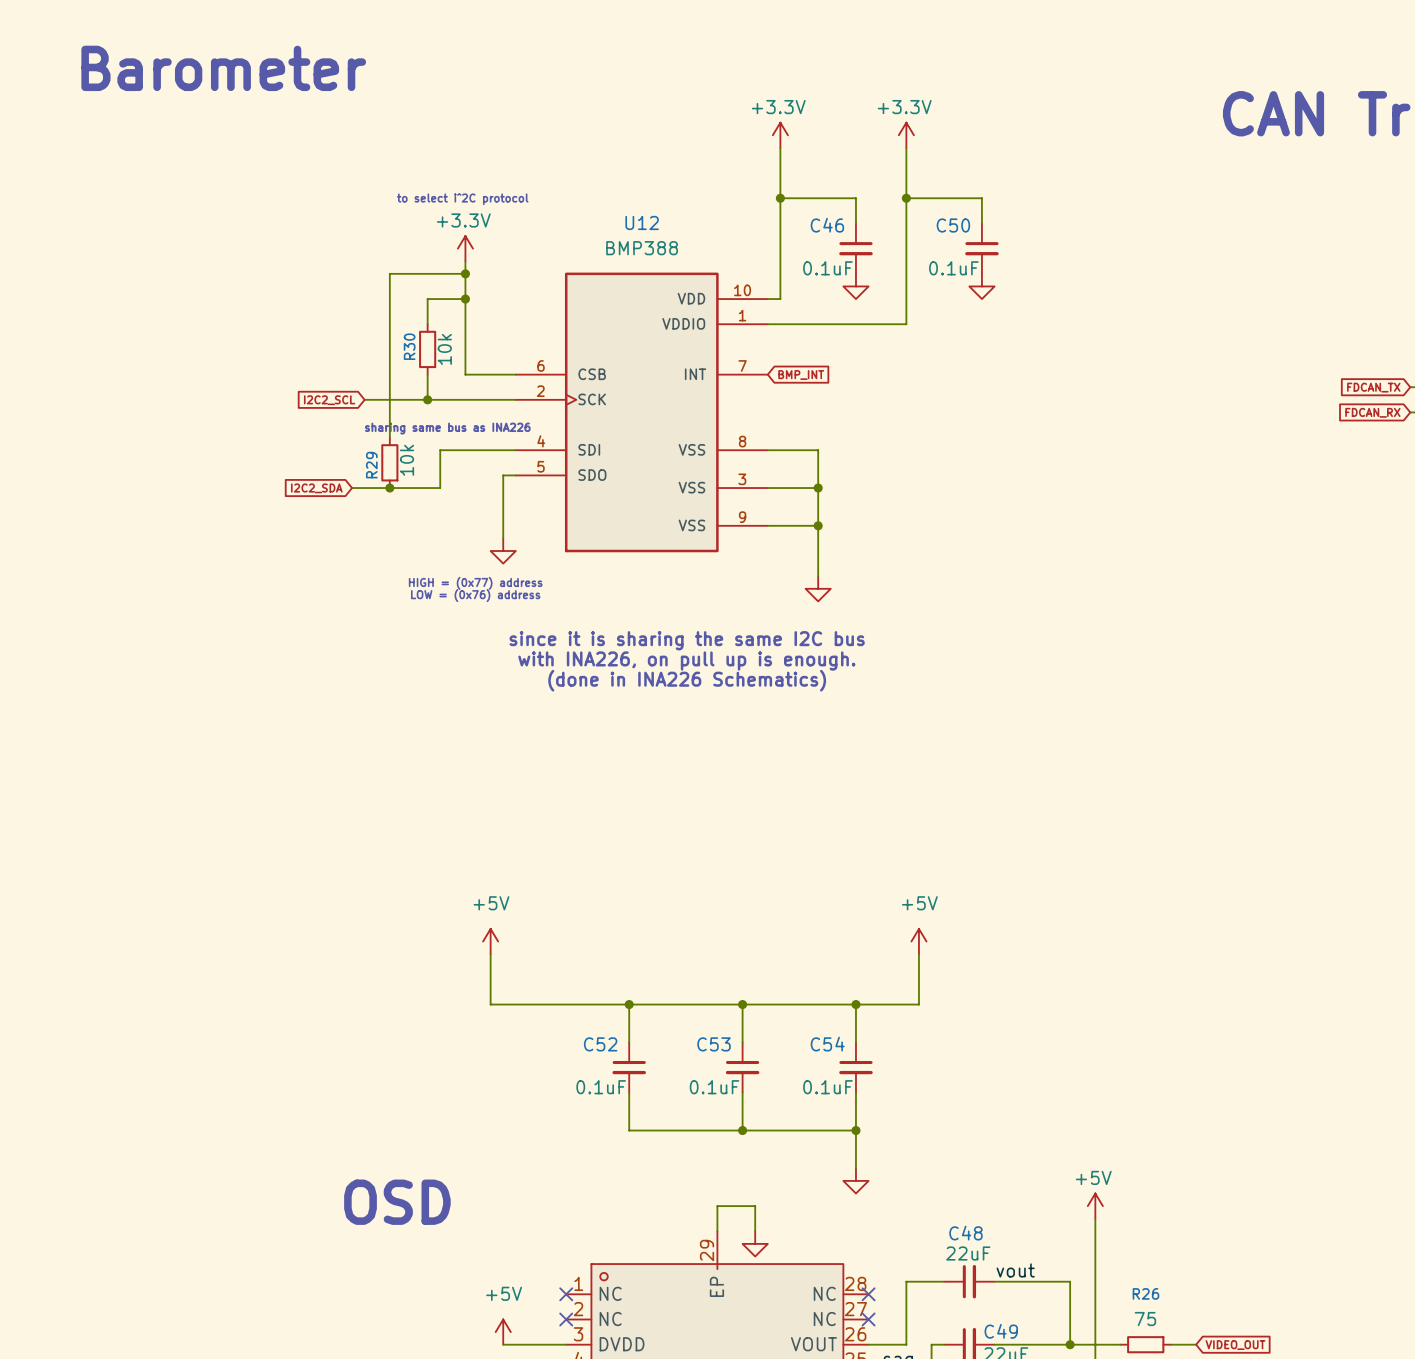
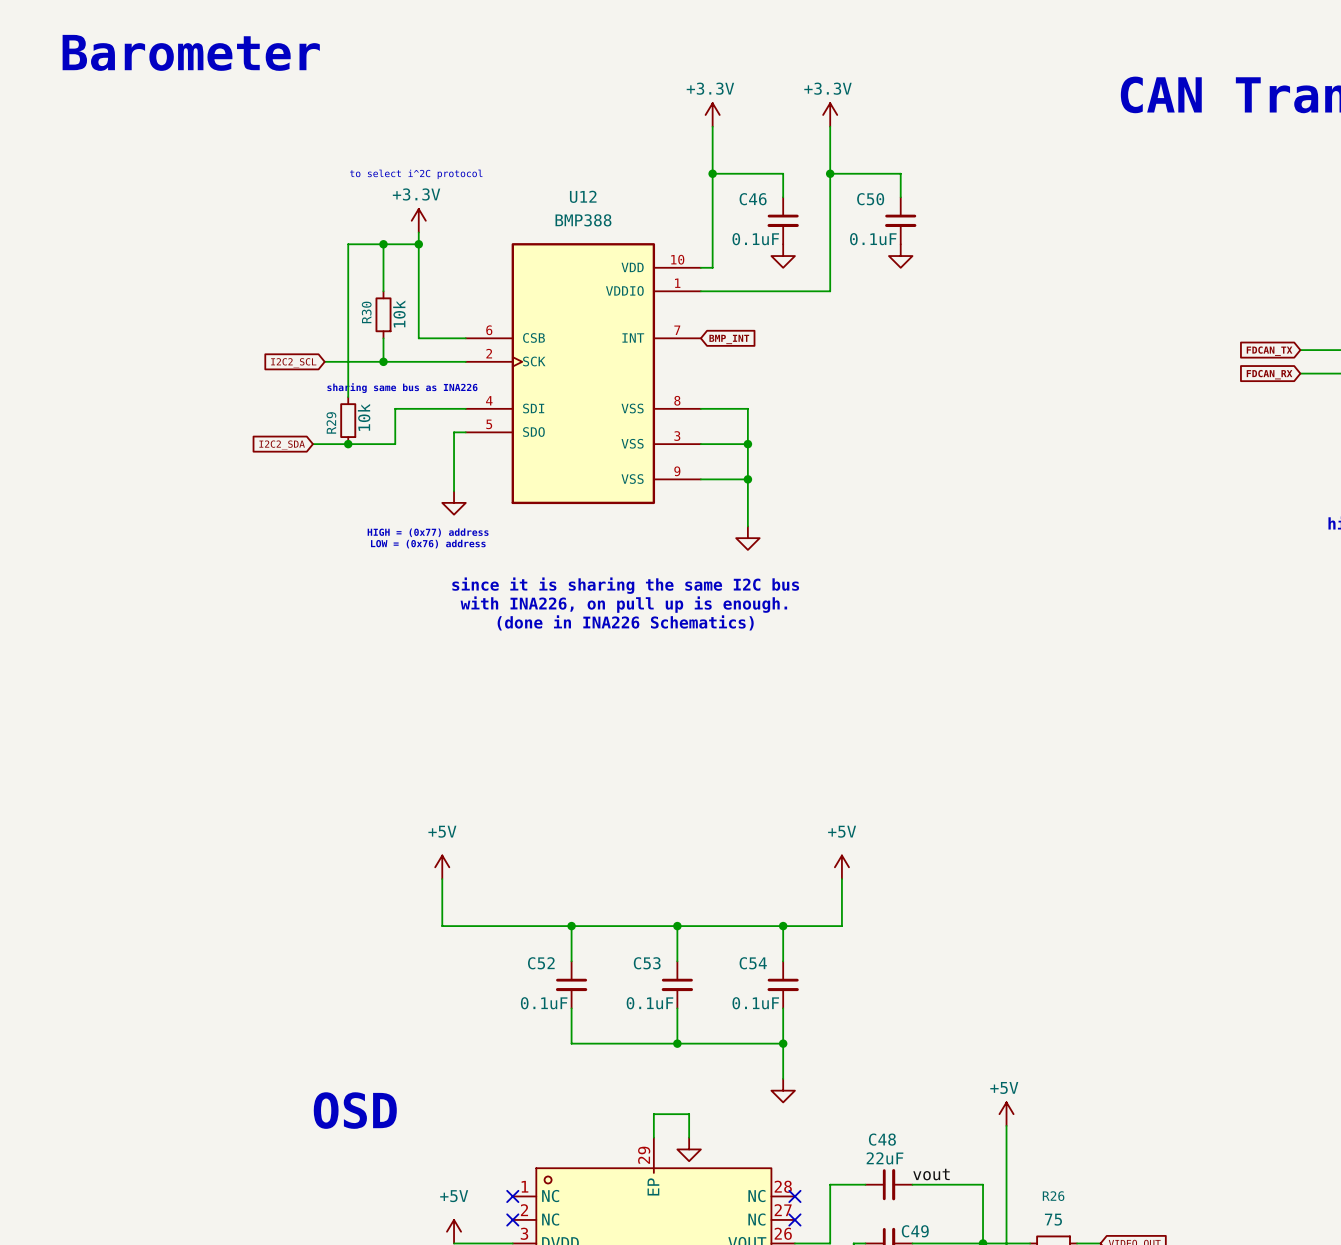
wire: (427, 299) (465, 299) -> (383, 267) (383, 244)
junction position: (465, 299) -> (383, 244)

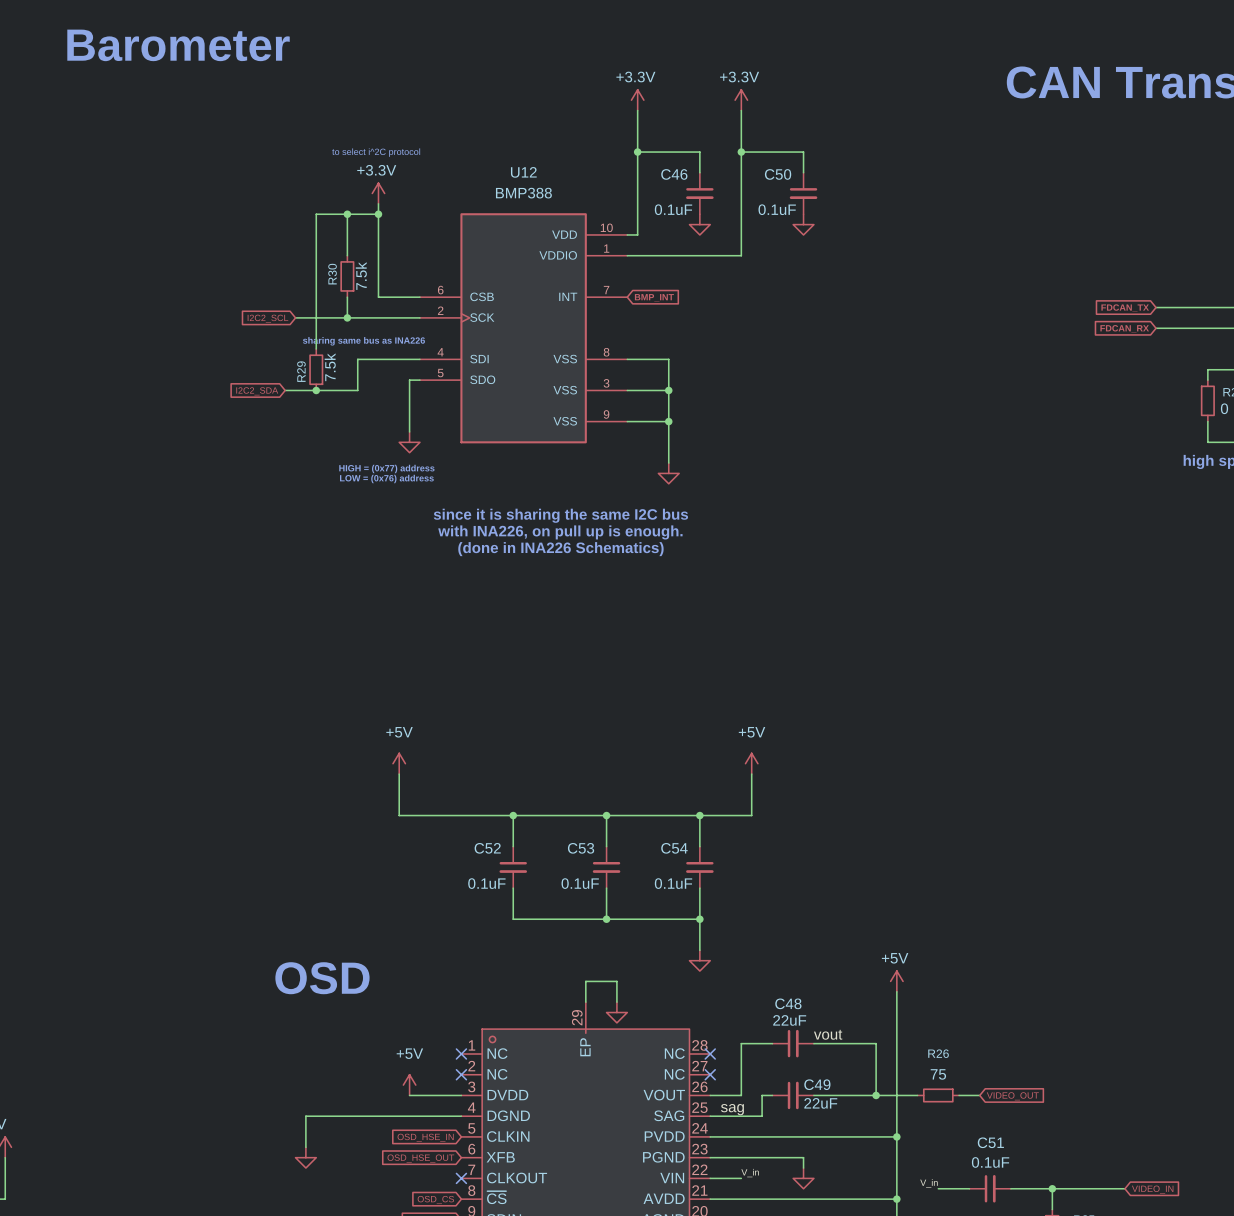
R30 value: 10k (399, 313) -> 7.5k (361, 276)
R29 value: 10k (364, 417) -> 7.5k (330, 367)

